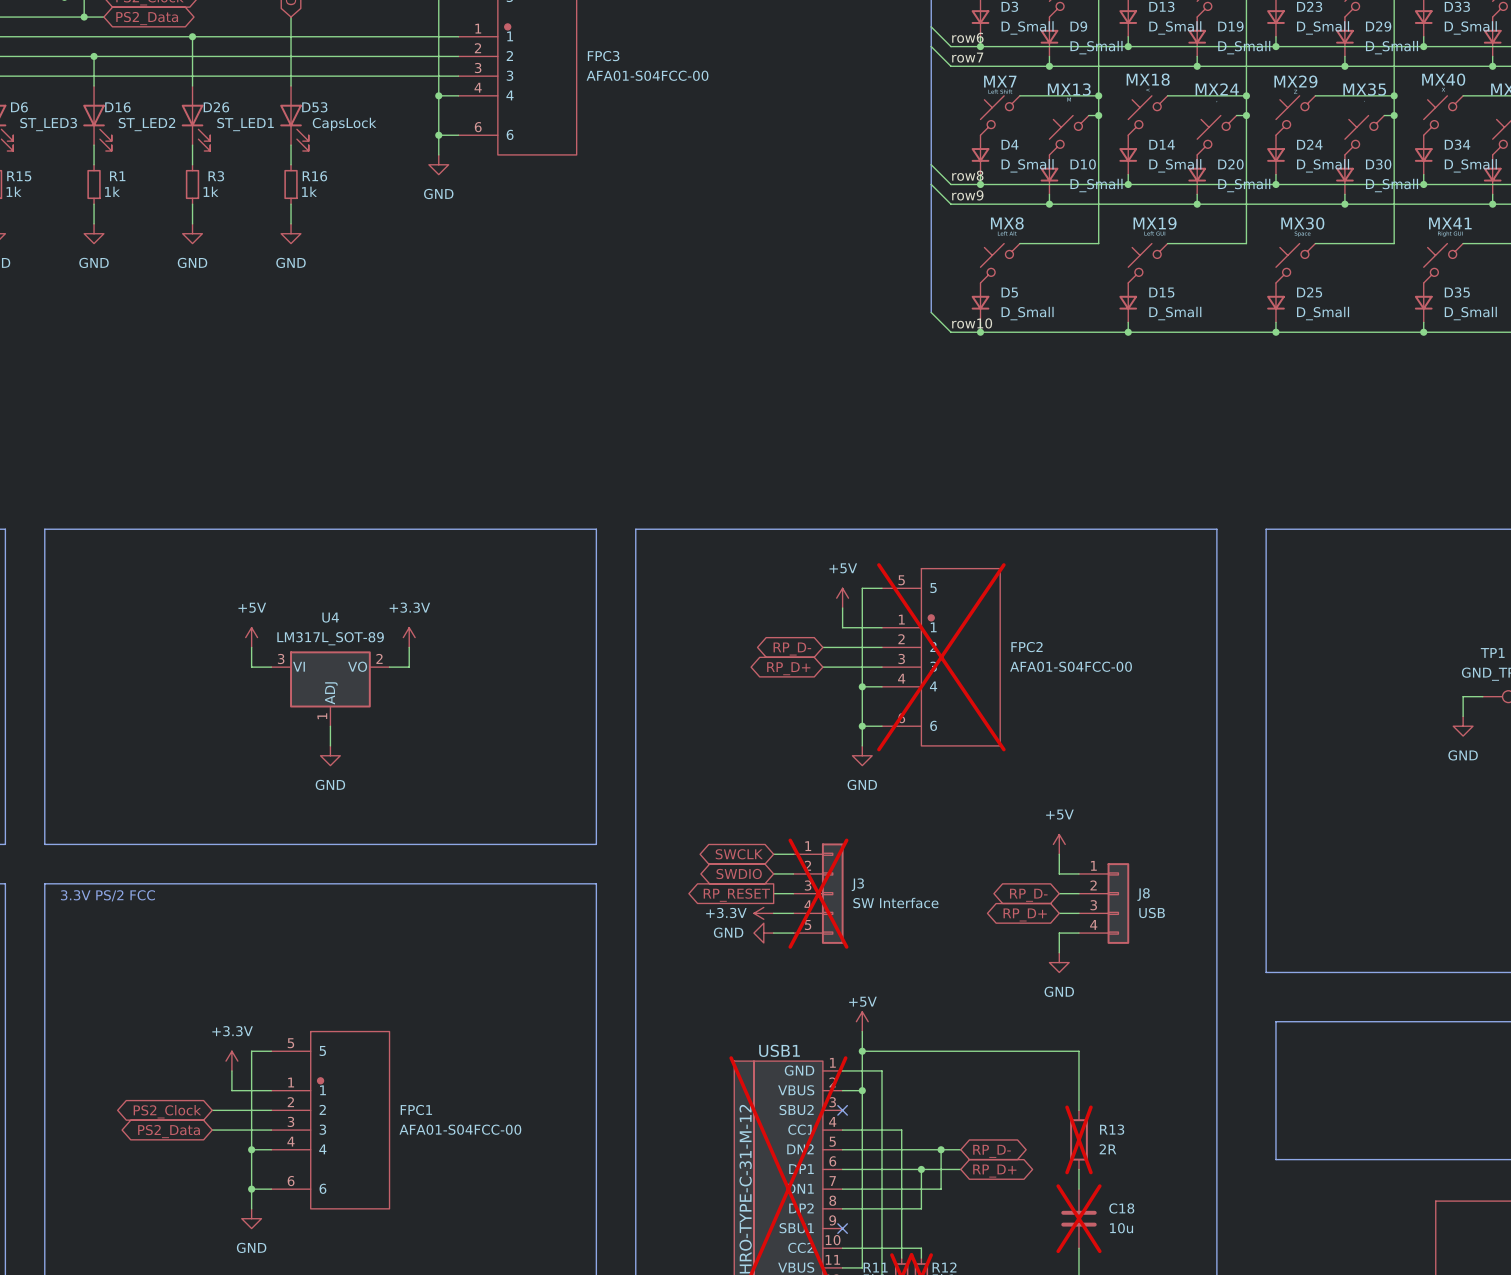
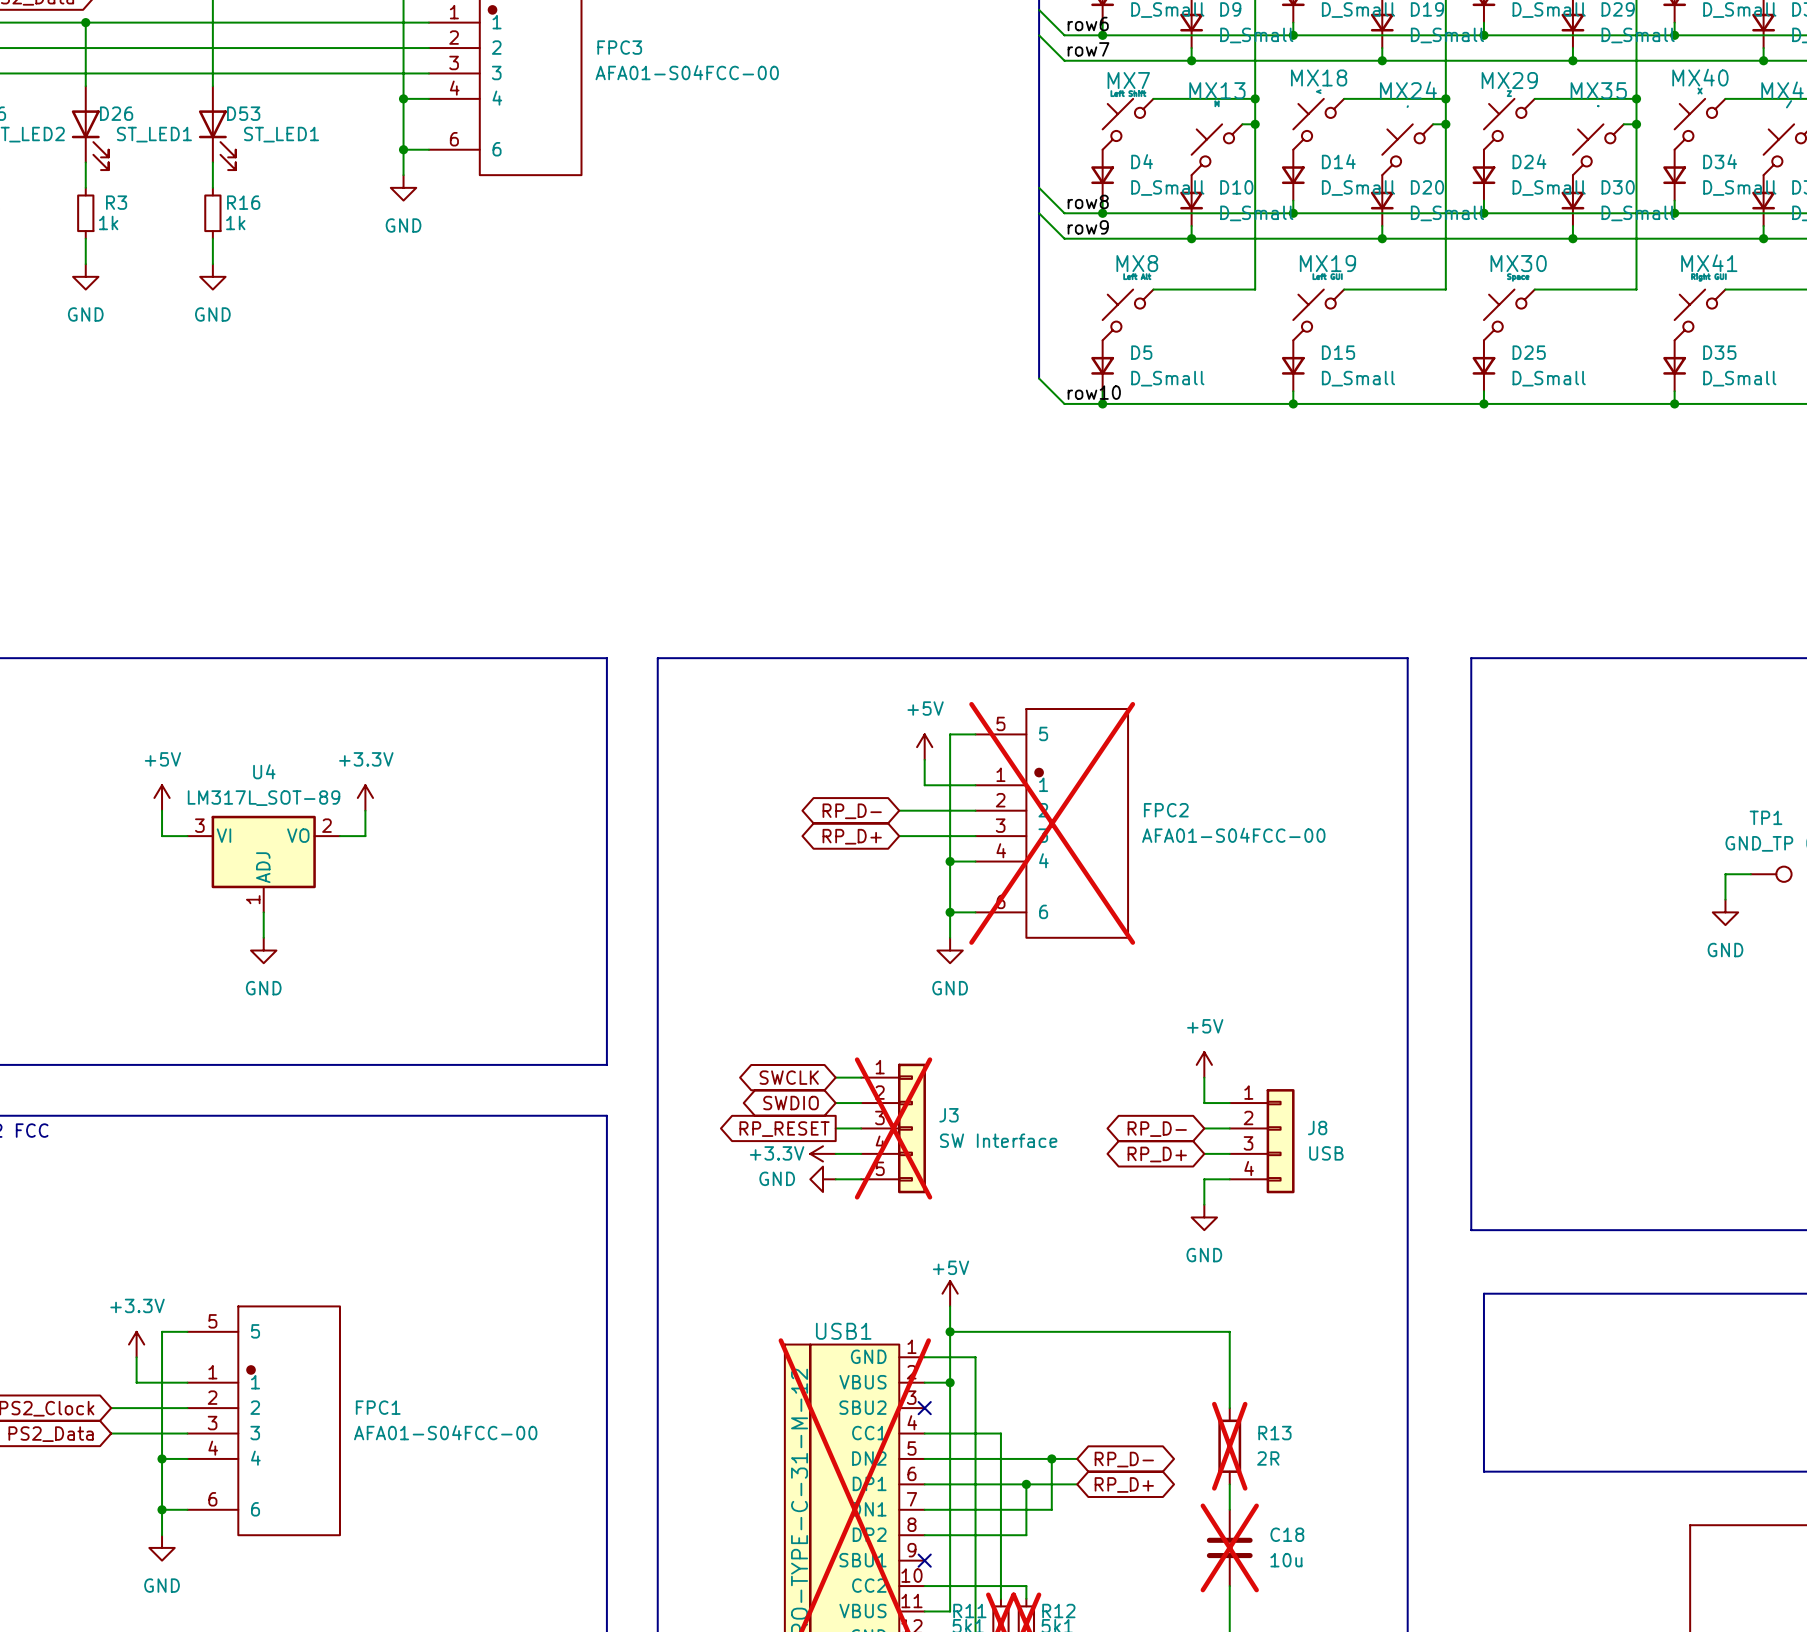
D53 value: CapsLock (344, 124) -> ST_LED1 (281, 134)

